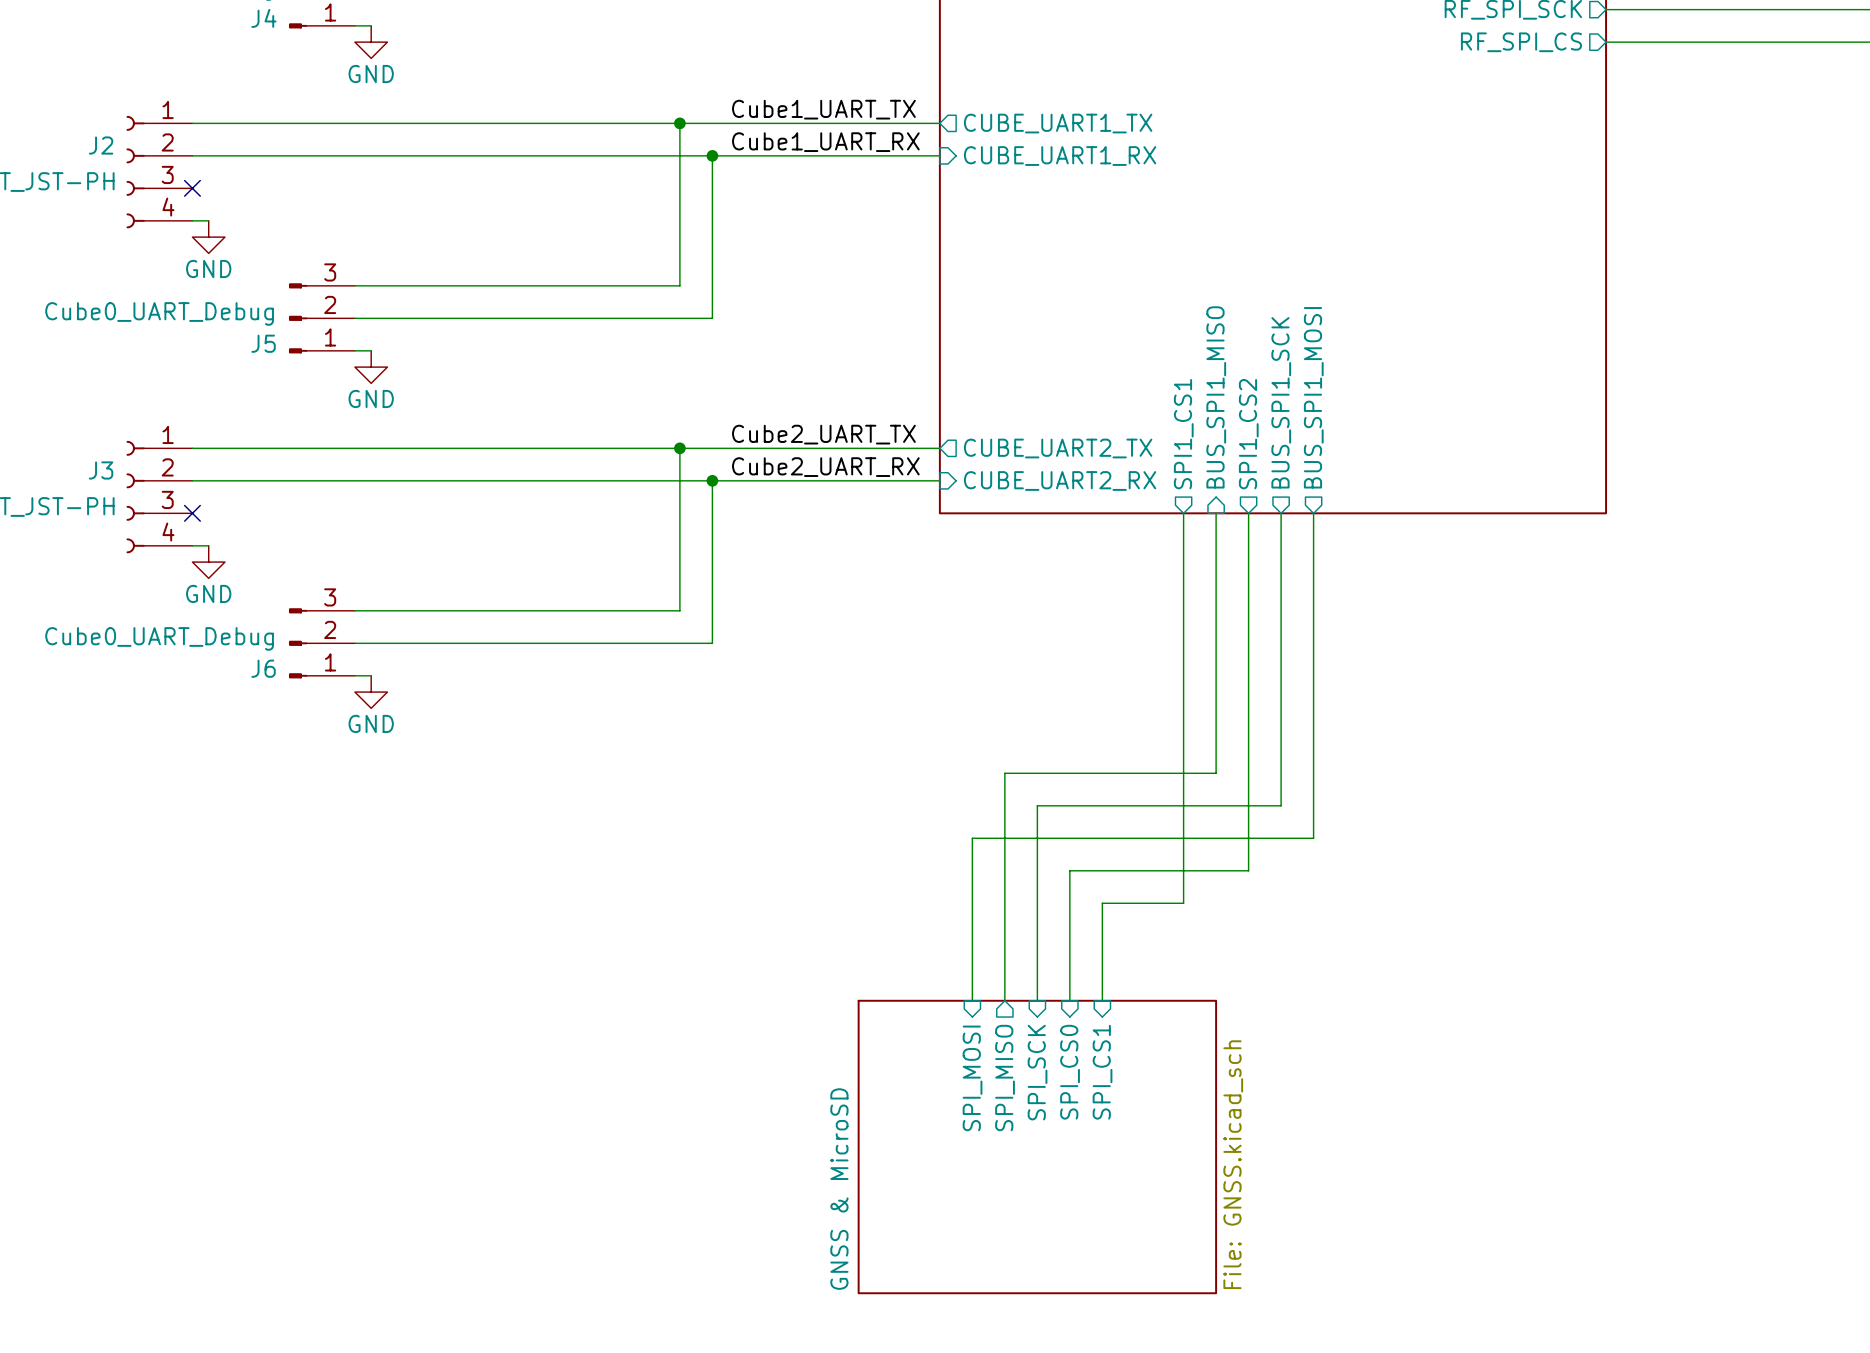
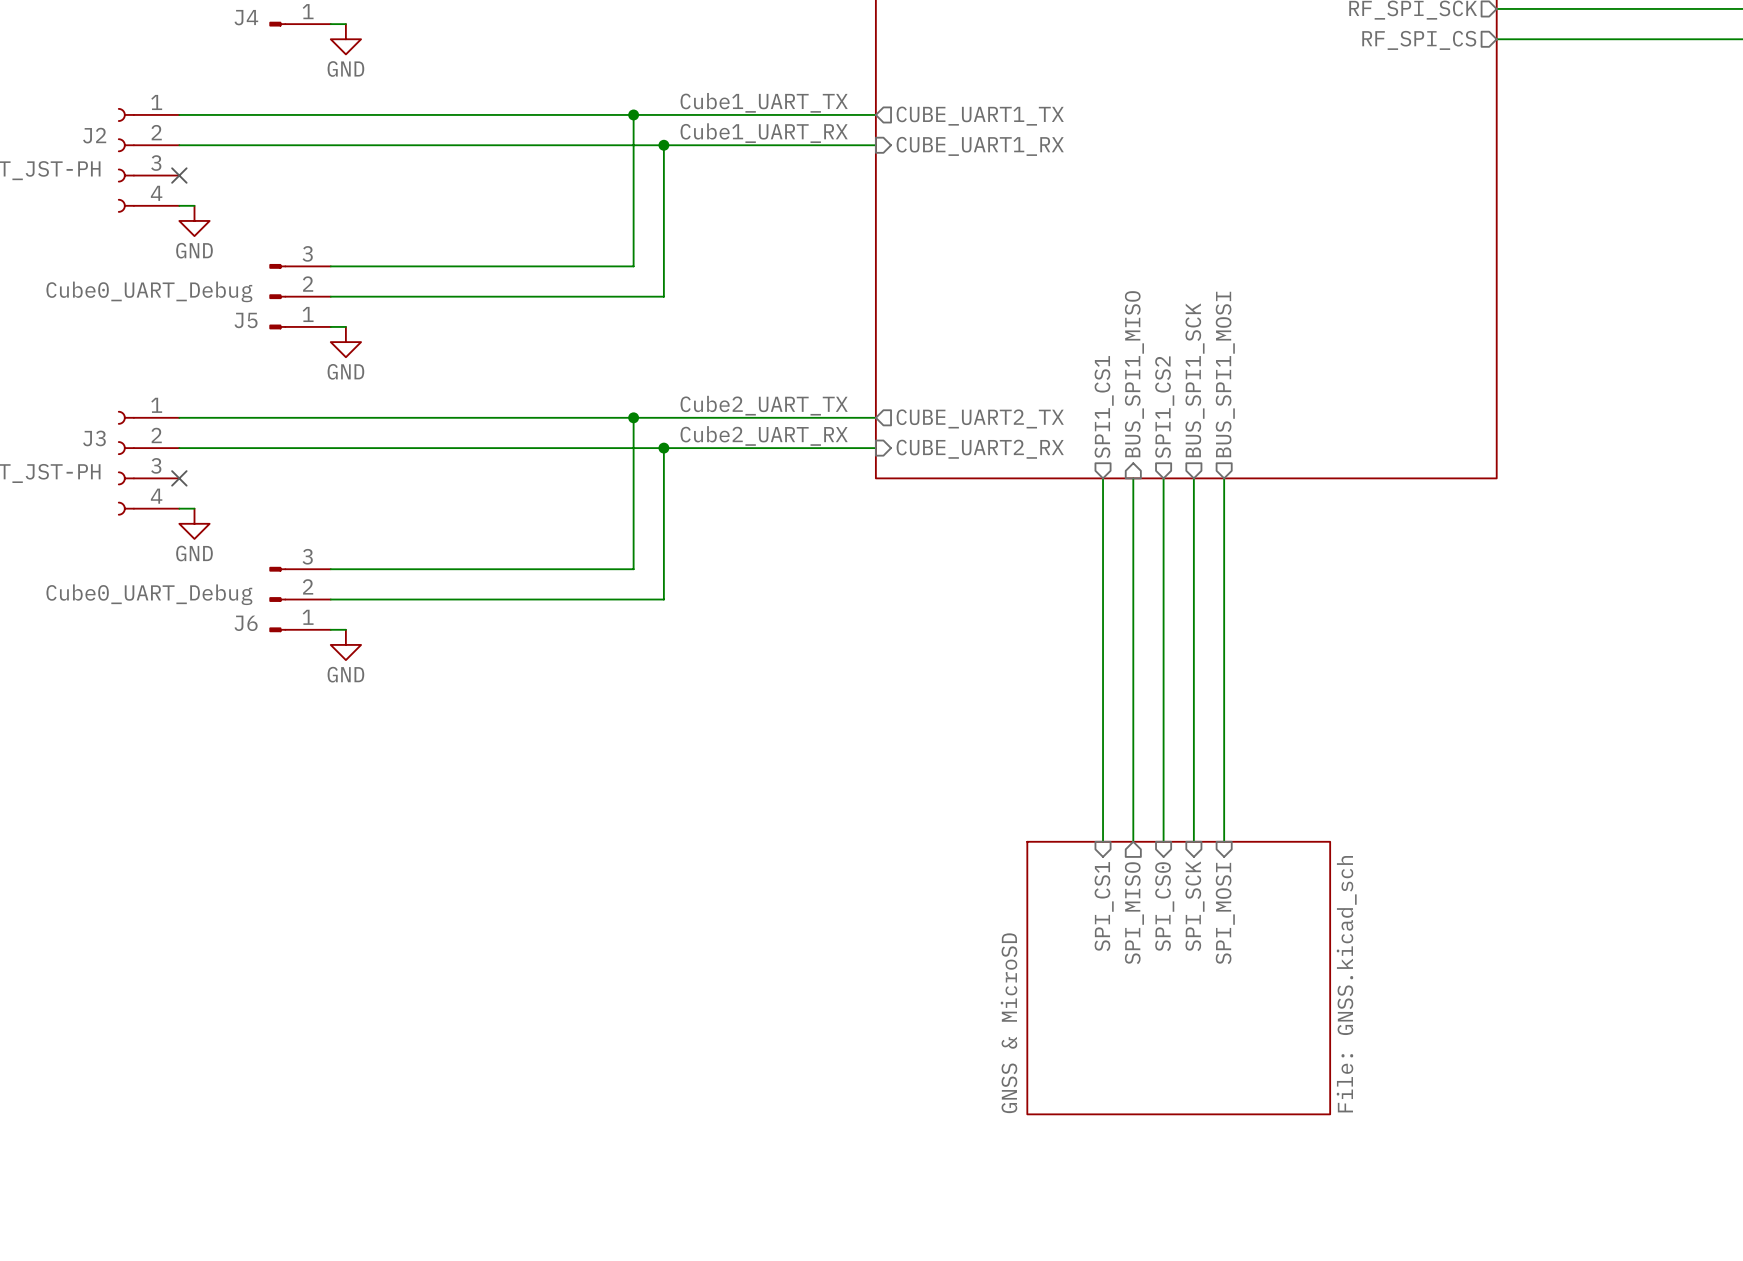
wire: (1216, 773) (1004, 773) (1004, 1000) -> (1133, 720) (1133, 841)
wire: (1281, 805) (1037, 805) (1037, 1000) -> (1193, 750) (1193, 841)
wire: (1313, 838) (972, 838) (972, 1000) -> (1224, 781) (1224, 841)
wire: (1248, 870) (1069, 870) (1069, 1000) -> (1163, 811) (1163, 841)
sheet pin: none -> SPI_MOSI (1225, 913)
sheet GNSS & MicroSD: none -> File: GNSS.kicad_sch (1178, 978)
sheet pin position: SPI_SCK (1037, 1072) -> SPI_SCK (1195, 906)
sheet pin position: SPI_CS0 (1070, 1072) -> SPI_CS0 (1164, 906)
sheet pin position: SPI_CS1 (1102, 1072) -> SPI_CS1 (1104, 906)
sheet pin: SPI_MOSI (972, 1078) -> none
sheet pin position: SPI_MISO (1005, 1078) -> SPI_MISO (1134, 913)
sheet GNSS & MicroSD: File: GNSS.kicad_sch (1037, 1147) -> none

